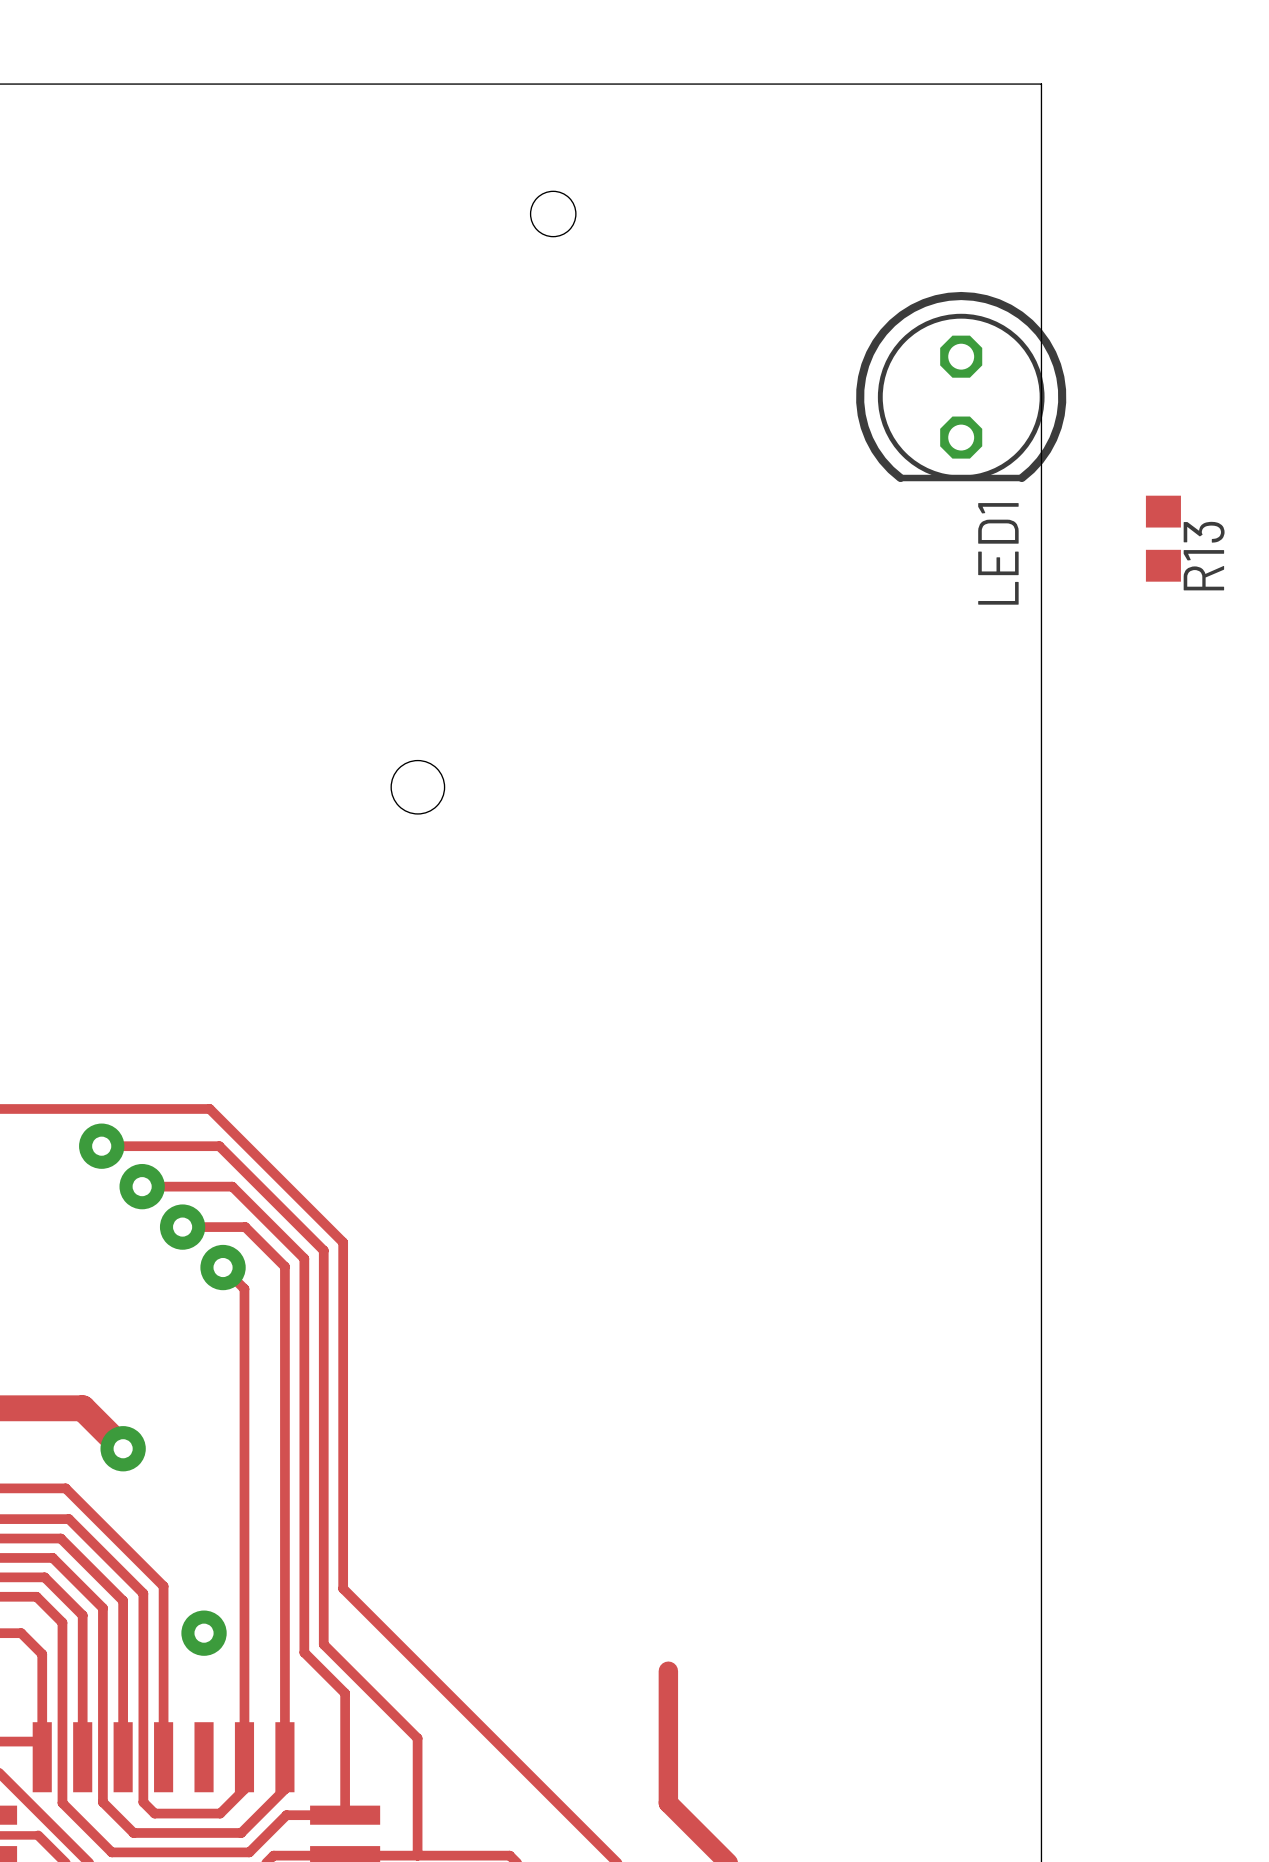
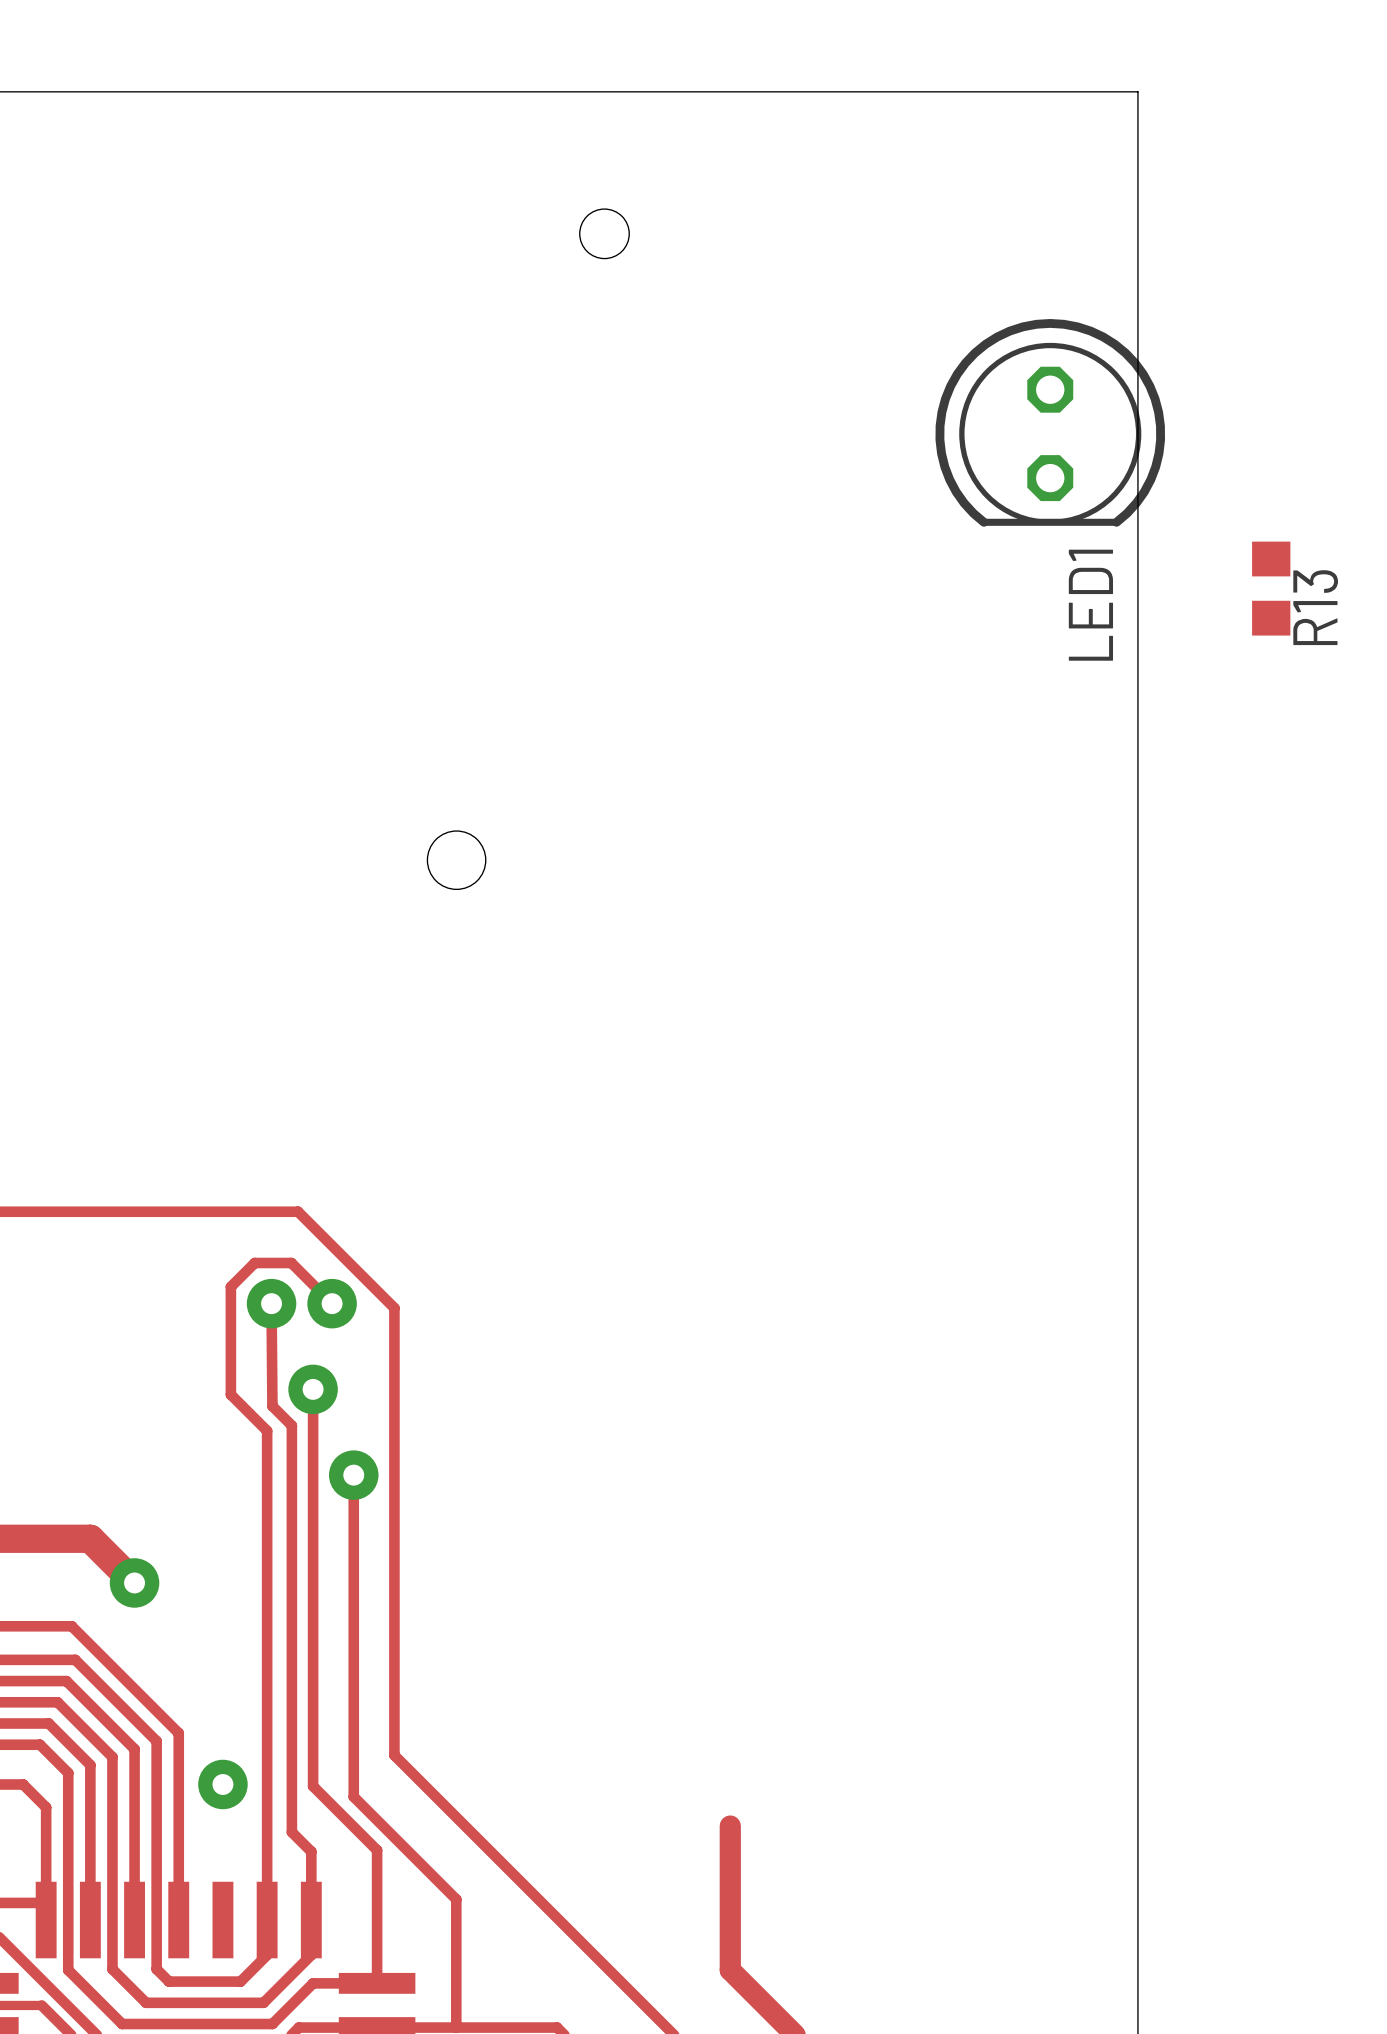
track: (209, 1108) (343, 1242) (343, 1588) (360, 1606) -> (229, 1211) (298, 1211) (394, 1308) (394, 1755)
track: (101, 1146) (219, 1146) (323, 1250) (323, 1350) -> none
via: (101, 1146) -> none
track: (142, 1186) (232, 1186) (304, 1258) (304, 1652) -> (313, 1389) (313, 1786) (332, 1805)
via: (142, 1186) -> none
via: none -> (271, 1303)
via: none -> (332, 1303)
track: (182, 1227) (245, 1227) (284, 1266) (284, 1694) -> (271, 1303) (272, 1406) (291, 1425) (291, 1832) (311, 1851)
via: (182, 1227) -> none
track: (223, 1267) (244, 1288) (244, 1309) -> (332, 1303) (291, 1262) (254, 1262) (230, 1286) (230, 1394) (267, 1430)
via: (223, 1267) -> none
via: none -> (313, 1389)
via: none -> (353, 1475)

